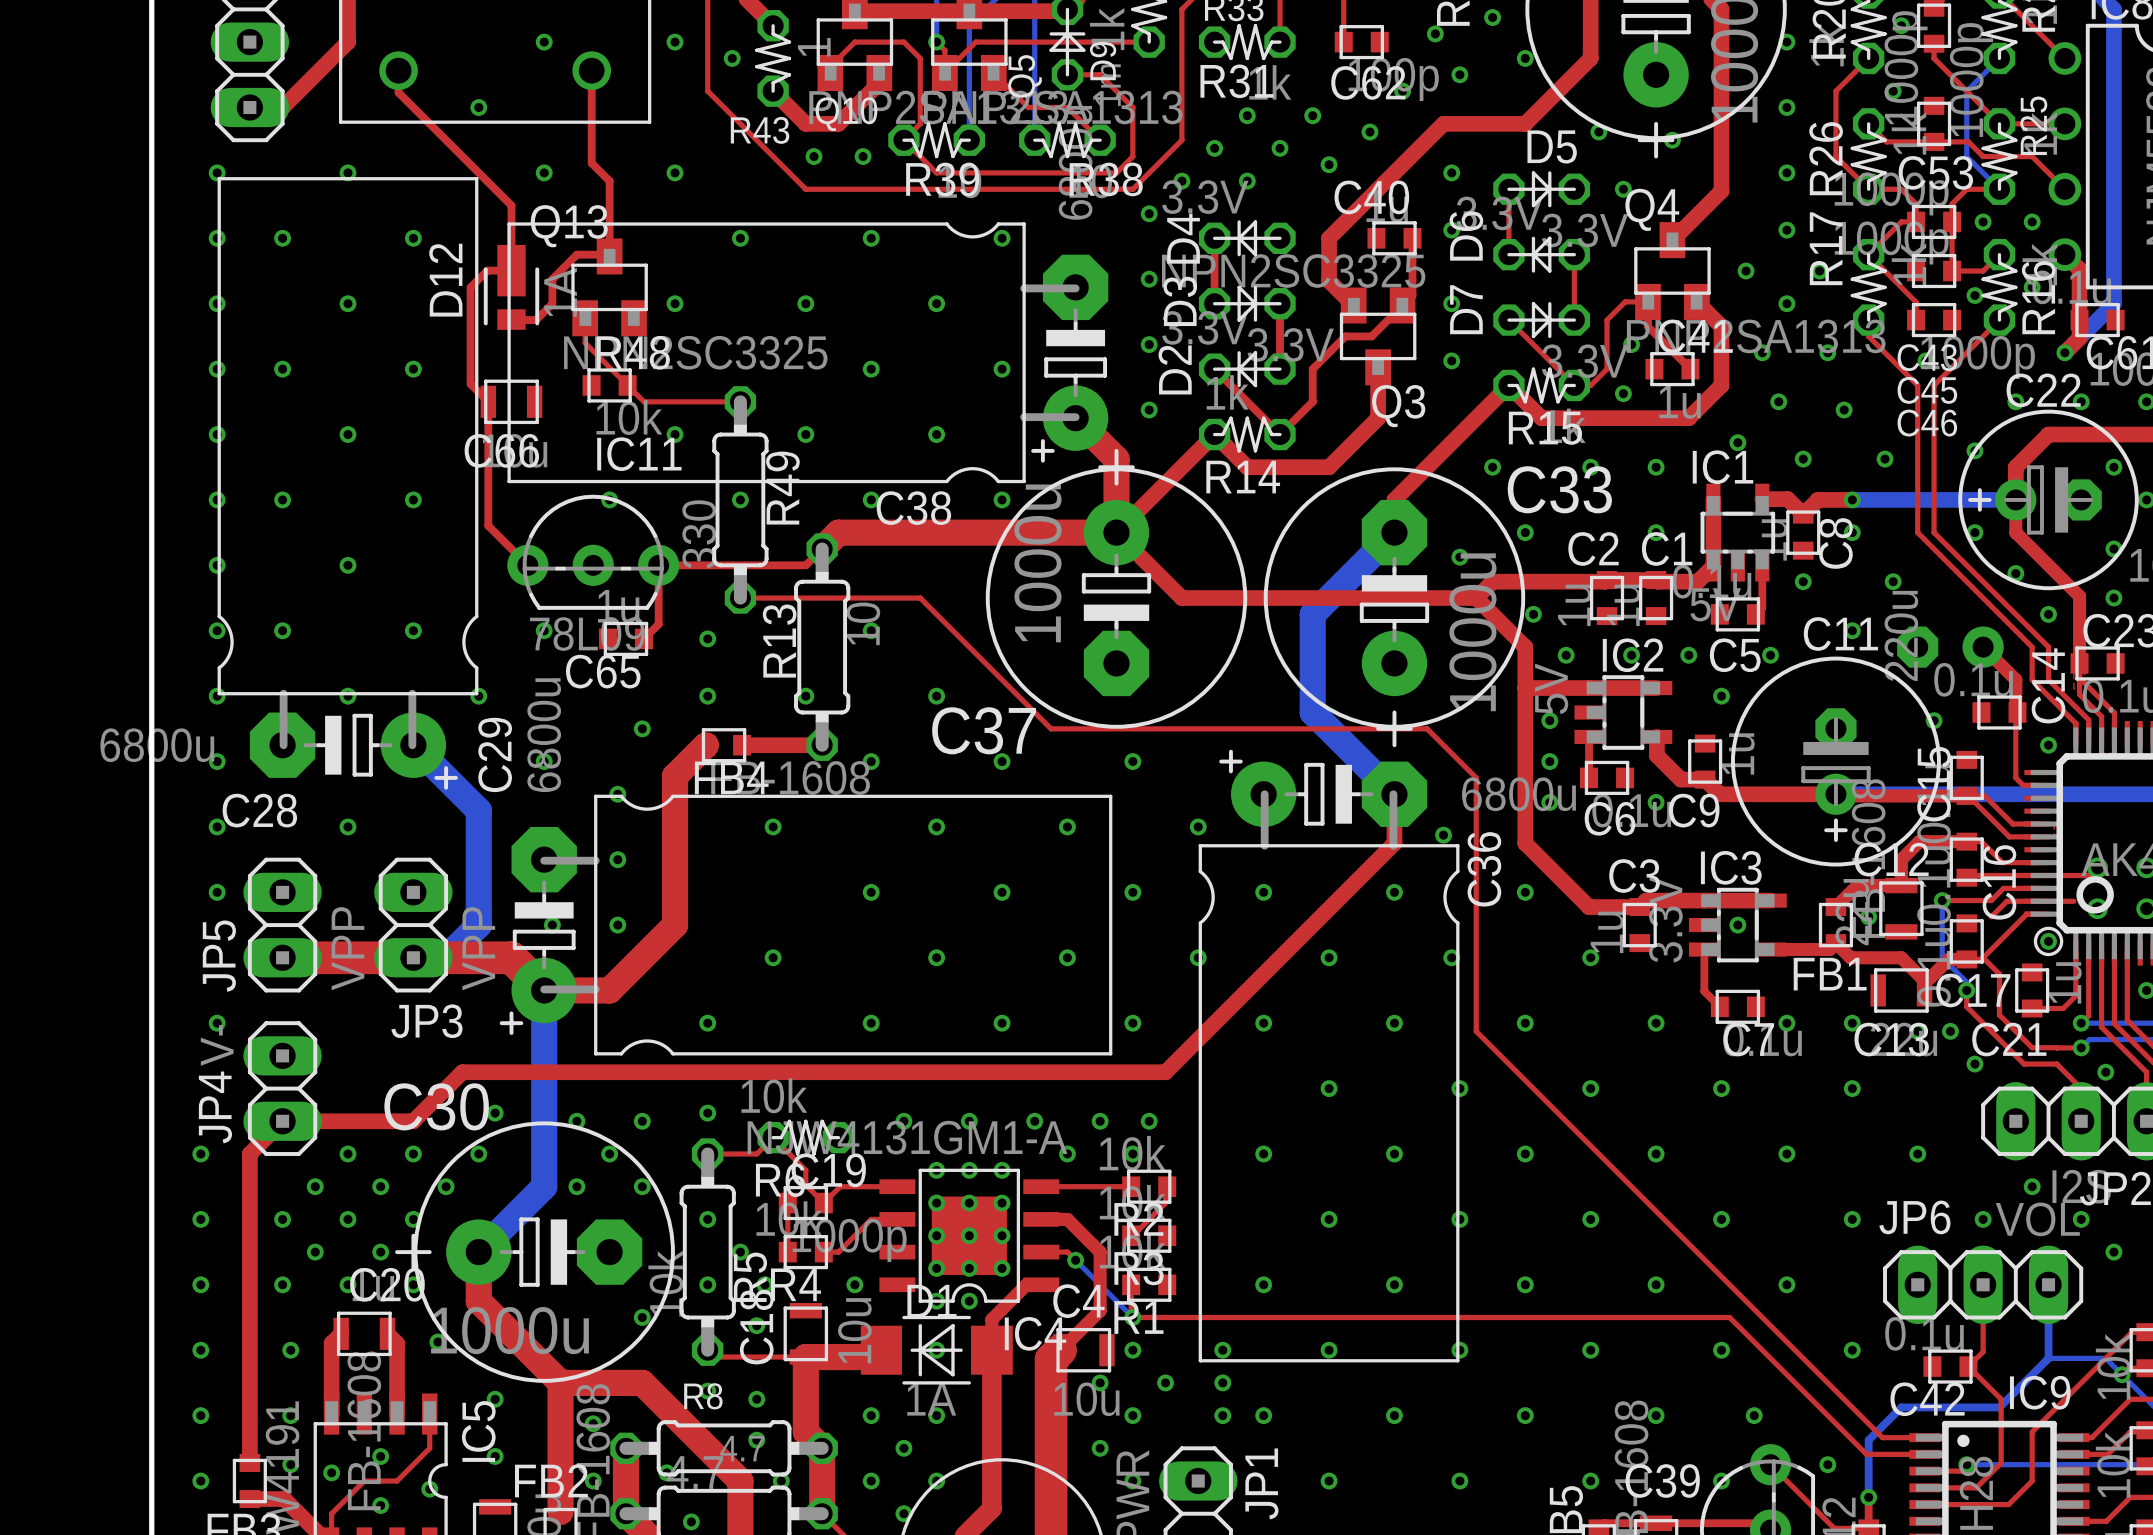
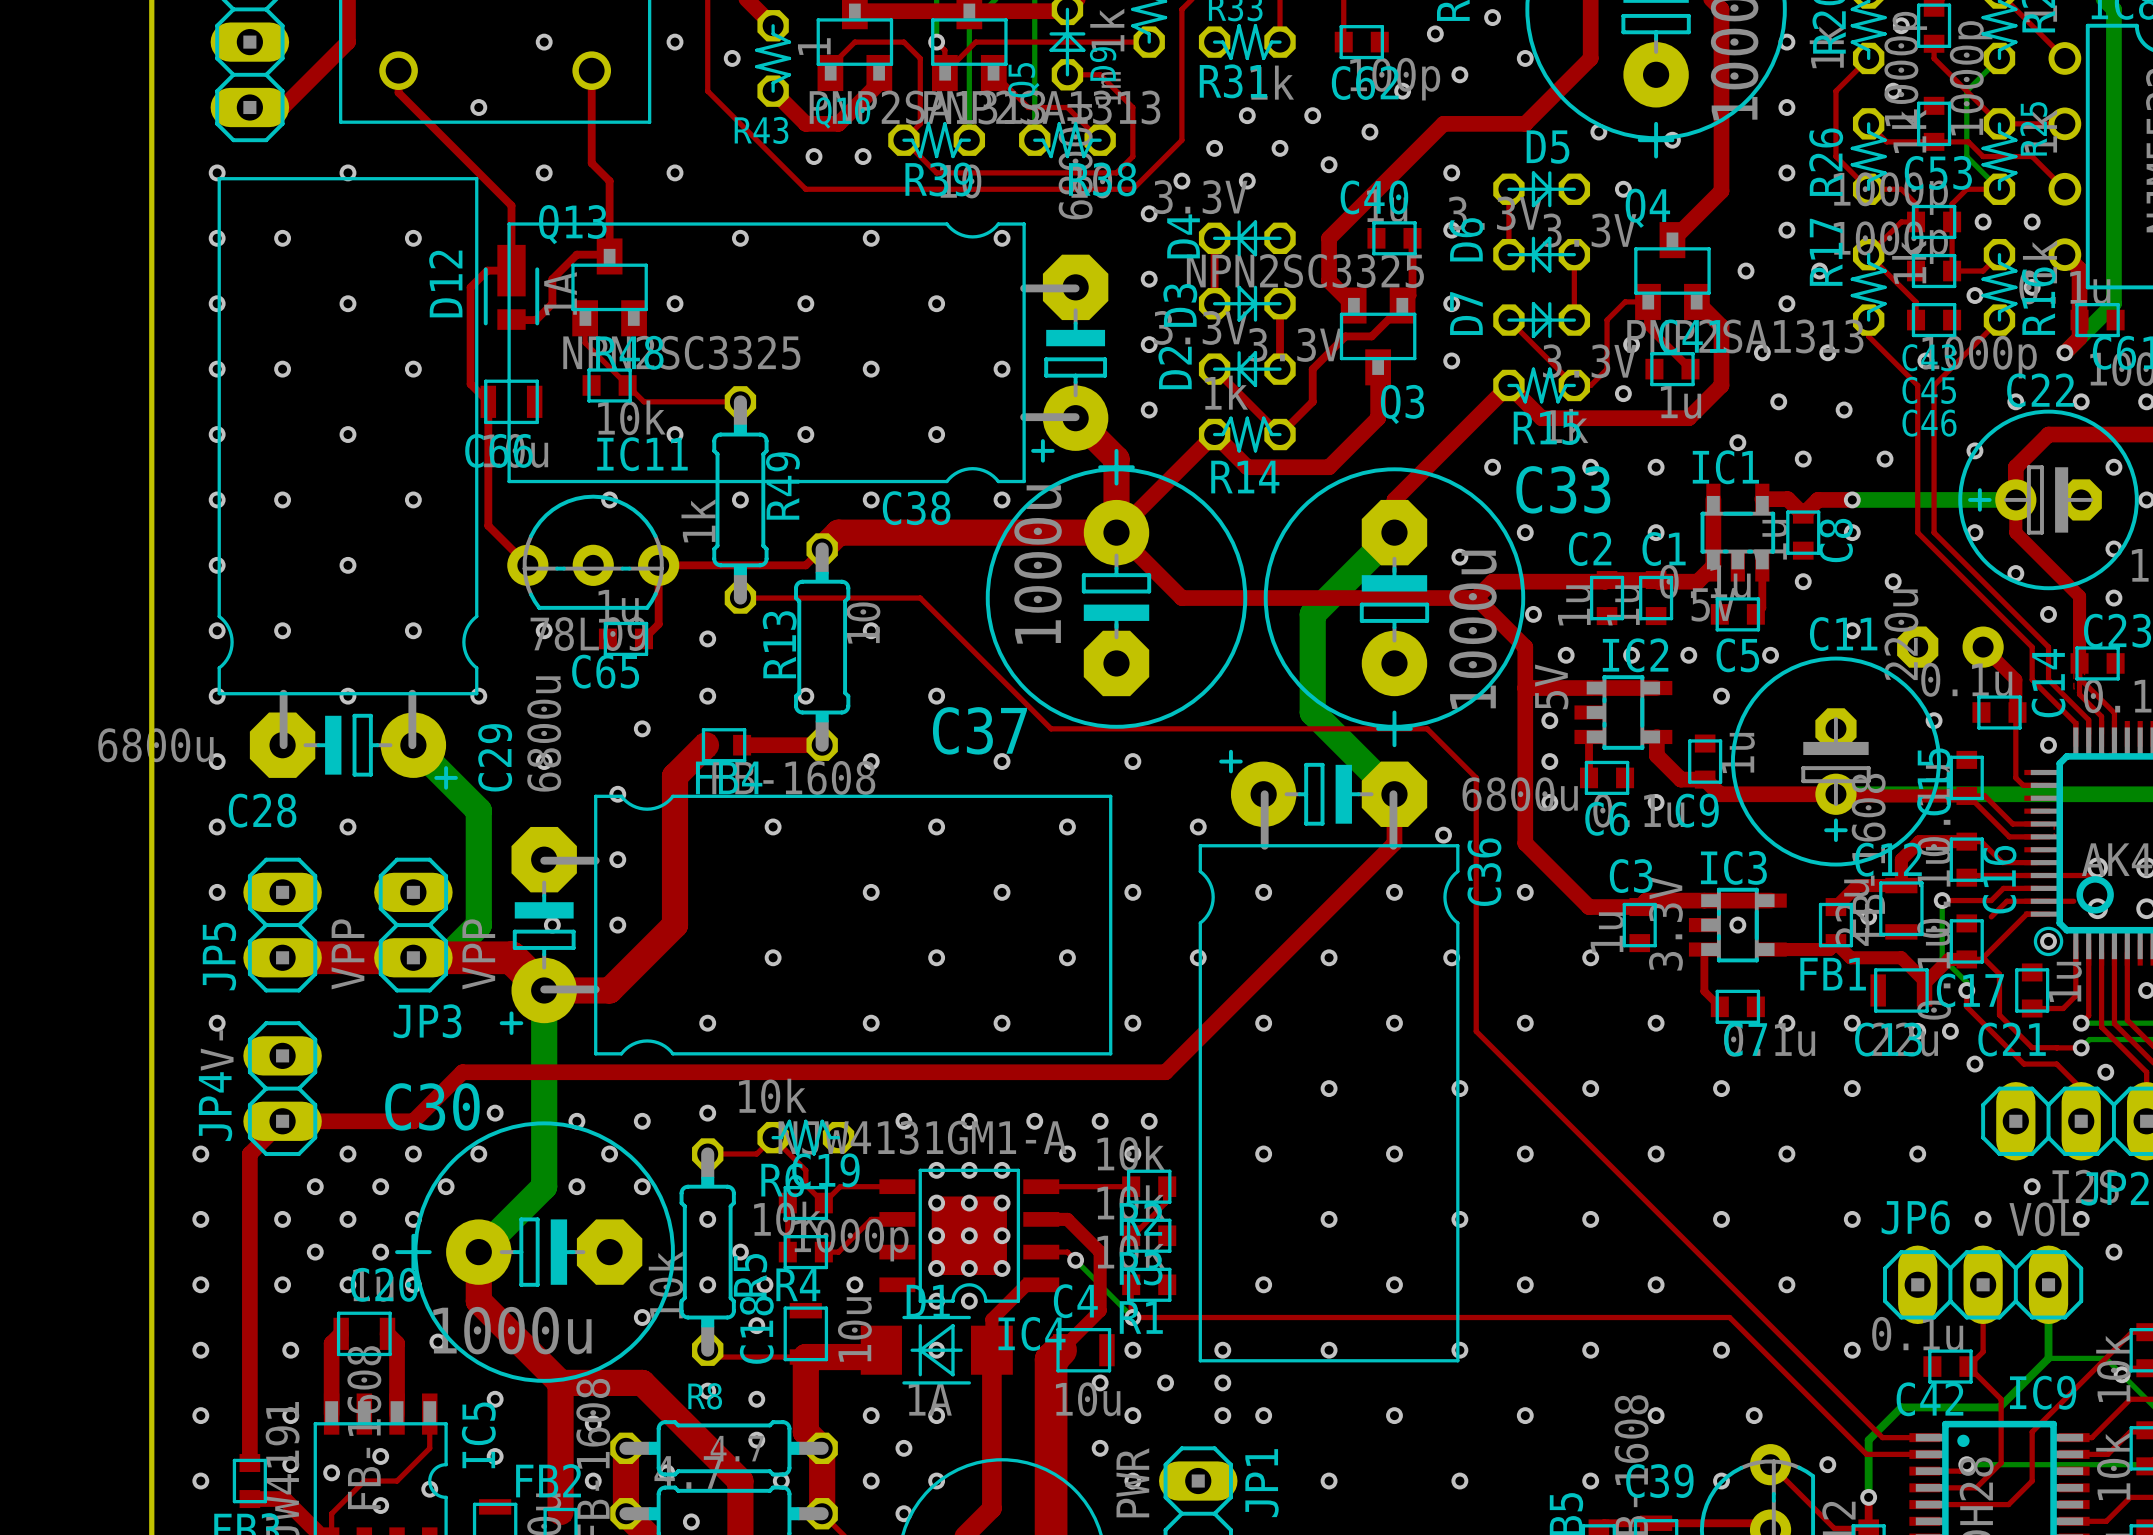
R49 value: 330 (699, 534) -> 1k (698, 520)

